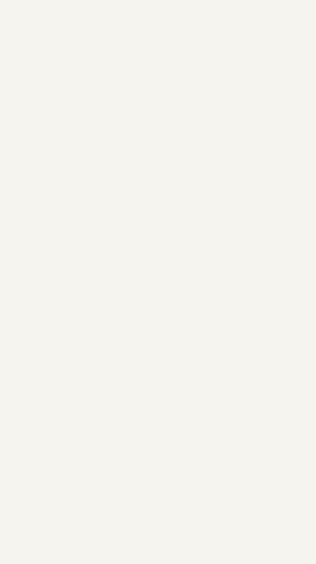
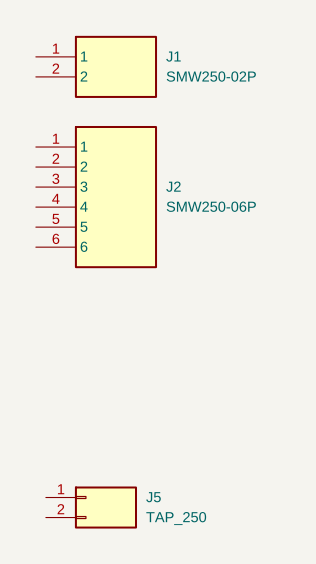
J1: none -> SMW250-02P (96, 66)
J2: none -> SMW250-06P (96, 197)
J5: none -> TAP_250 (91, 507)

